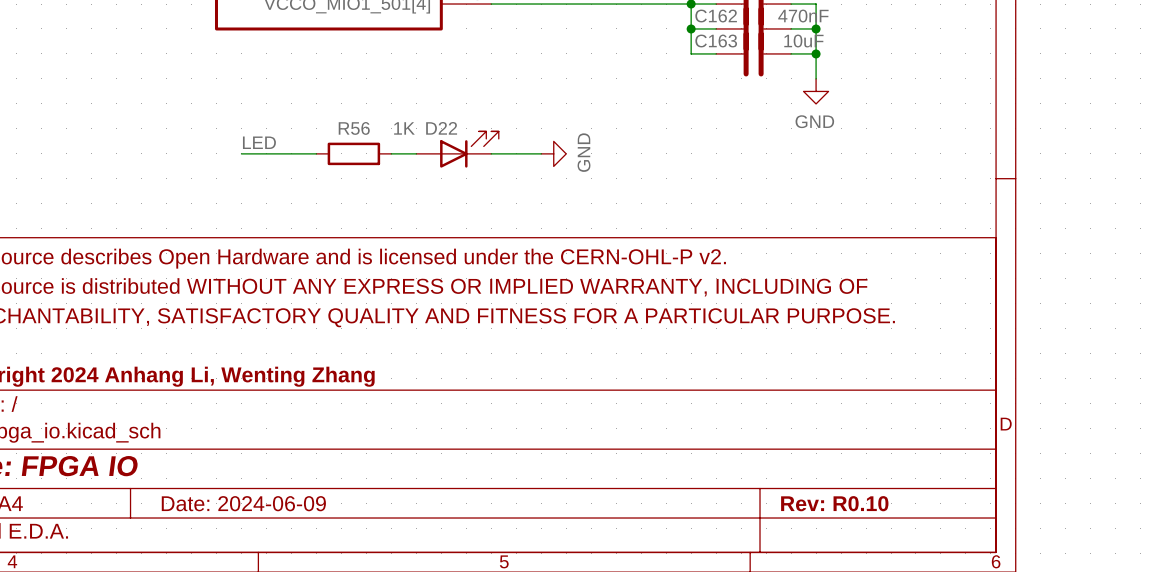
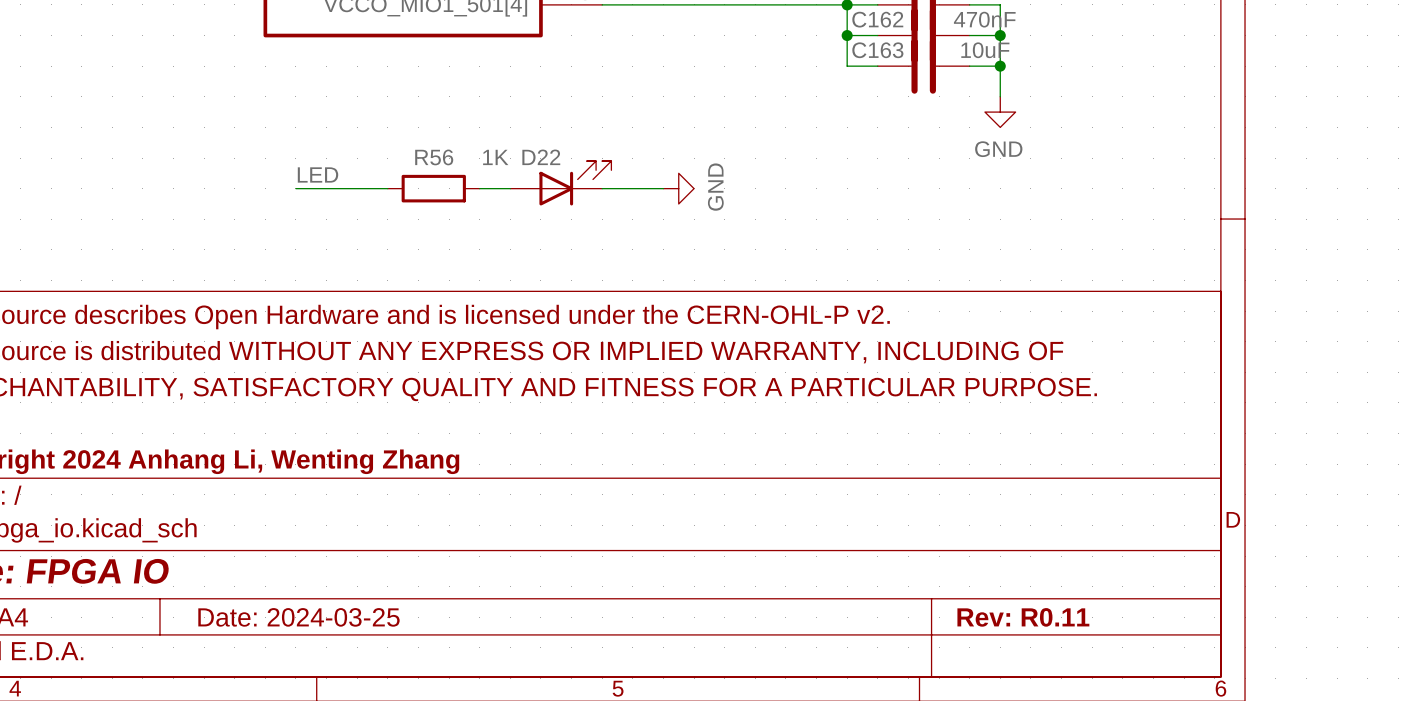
title block: Date: 2024-06-09 (243, 503) -> Date: 2024-03-25 (298, 617)
title block: Rev: R0.10 (834, 503) -> Rev: R0.11 (1023, 617)

